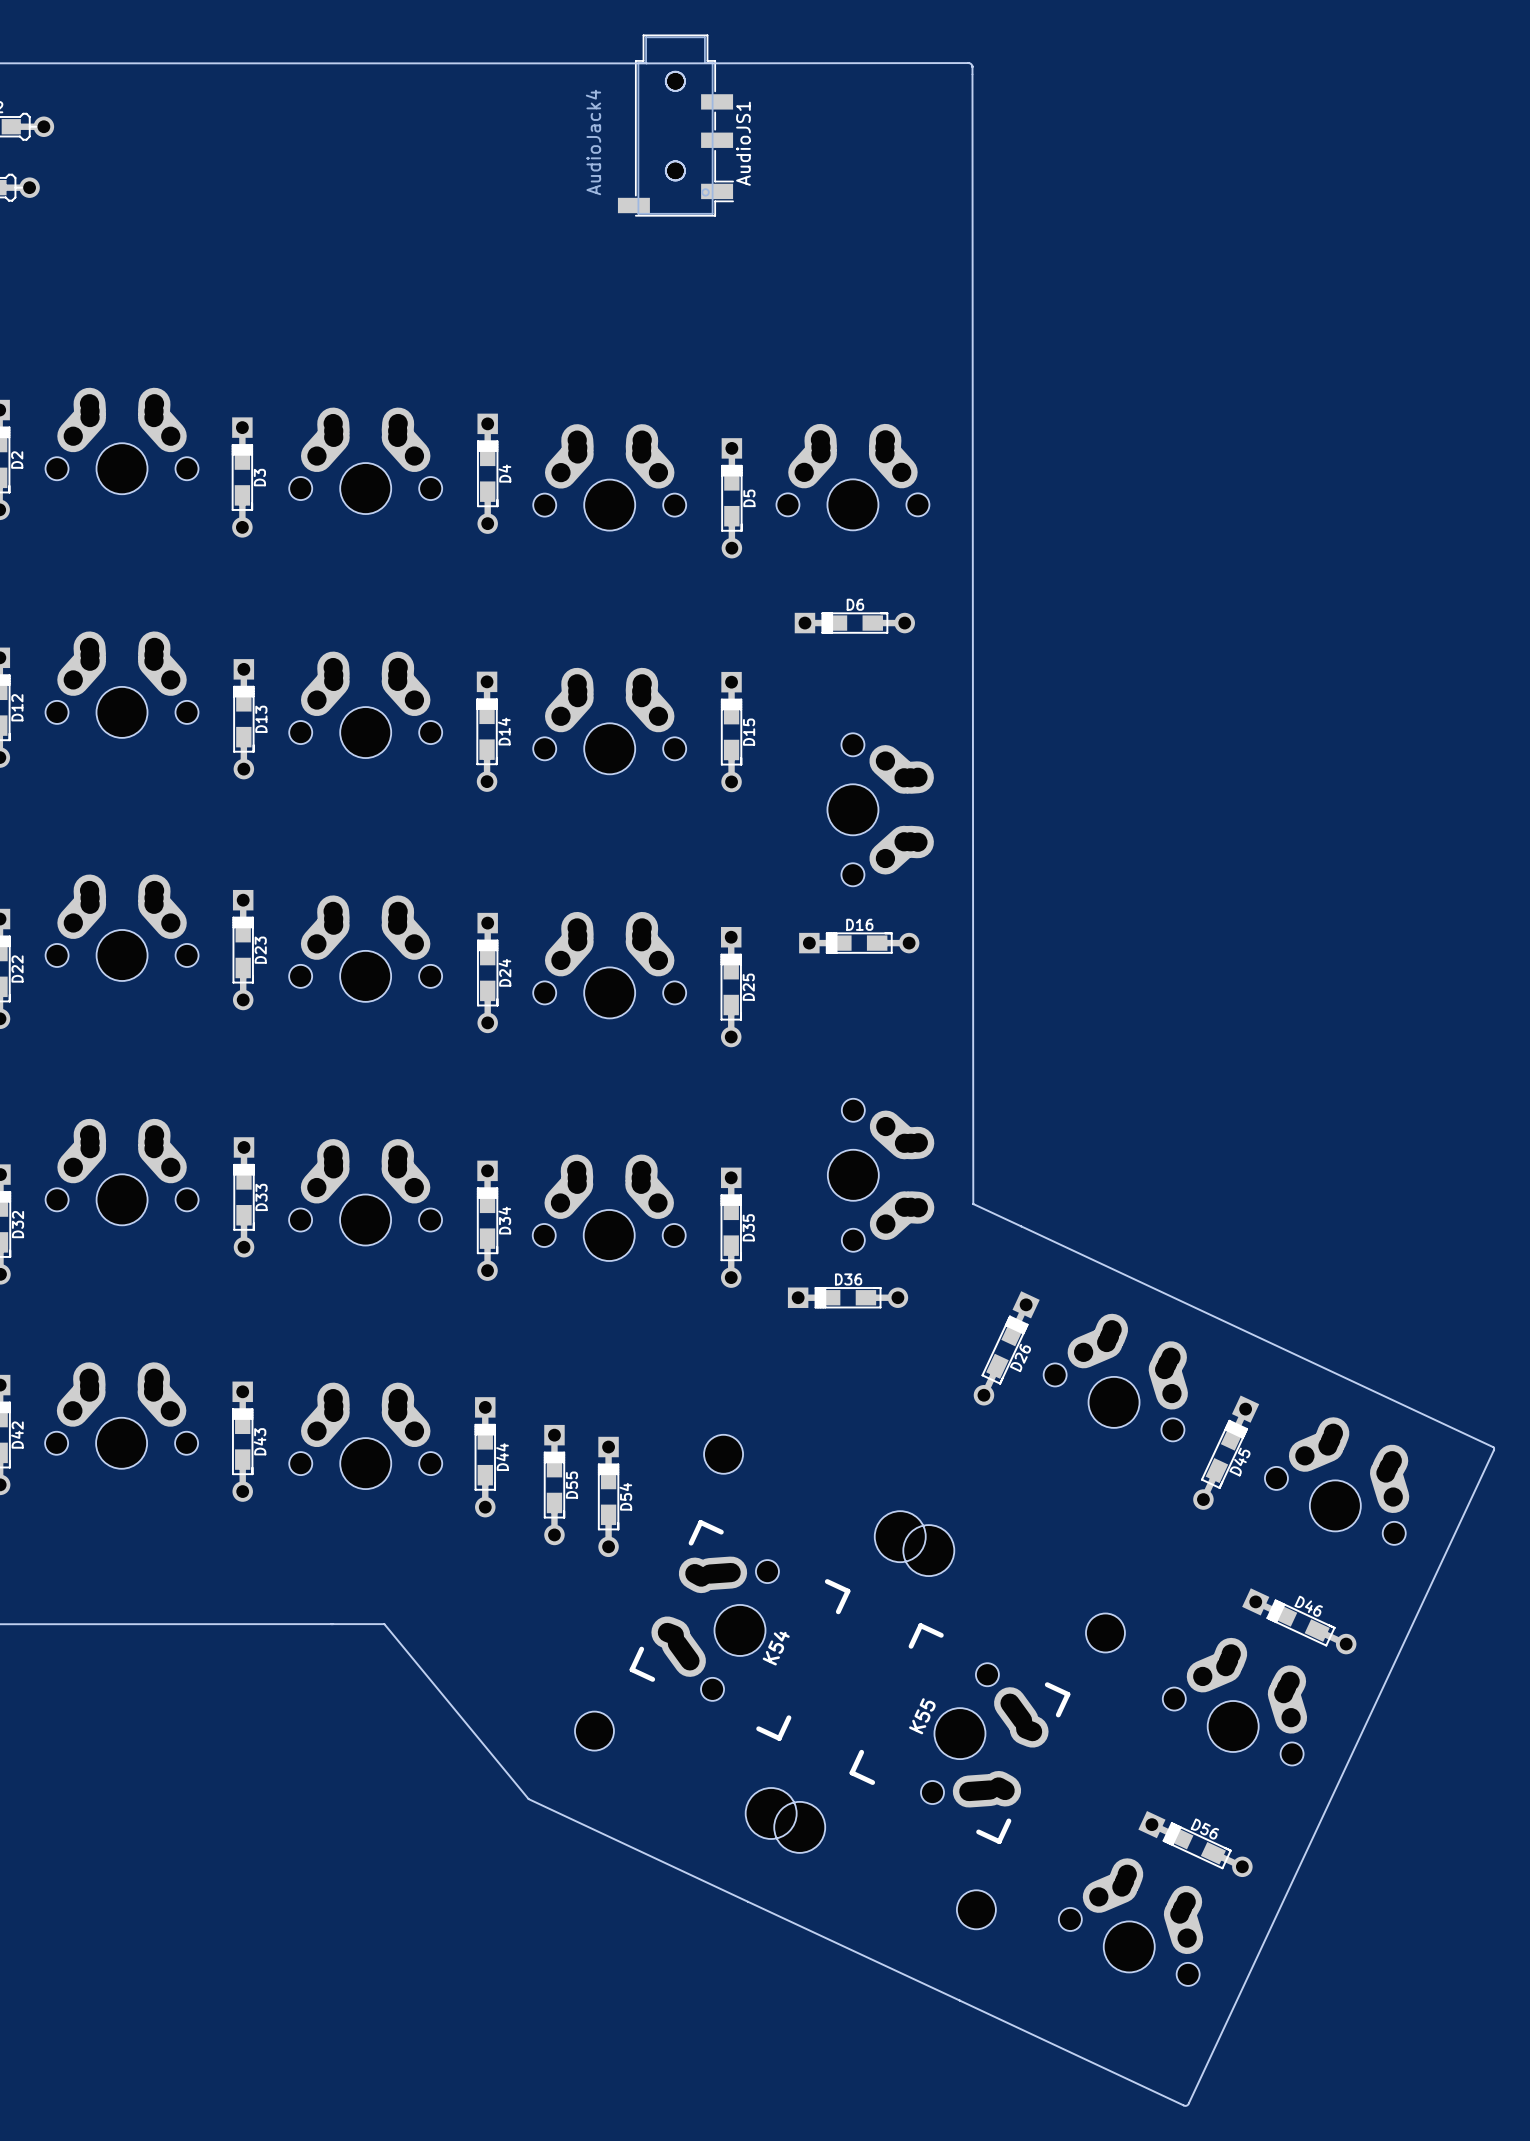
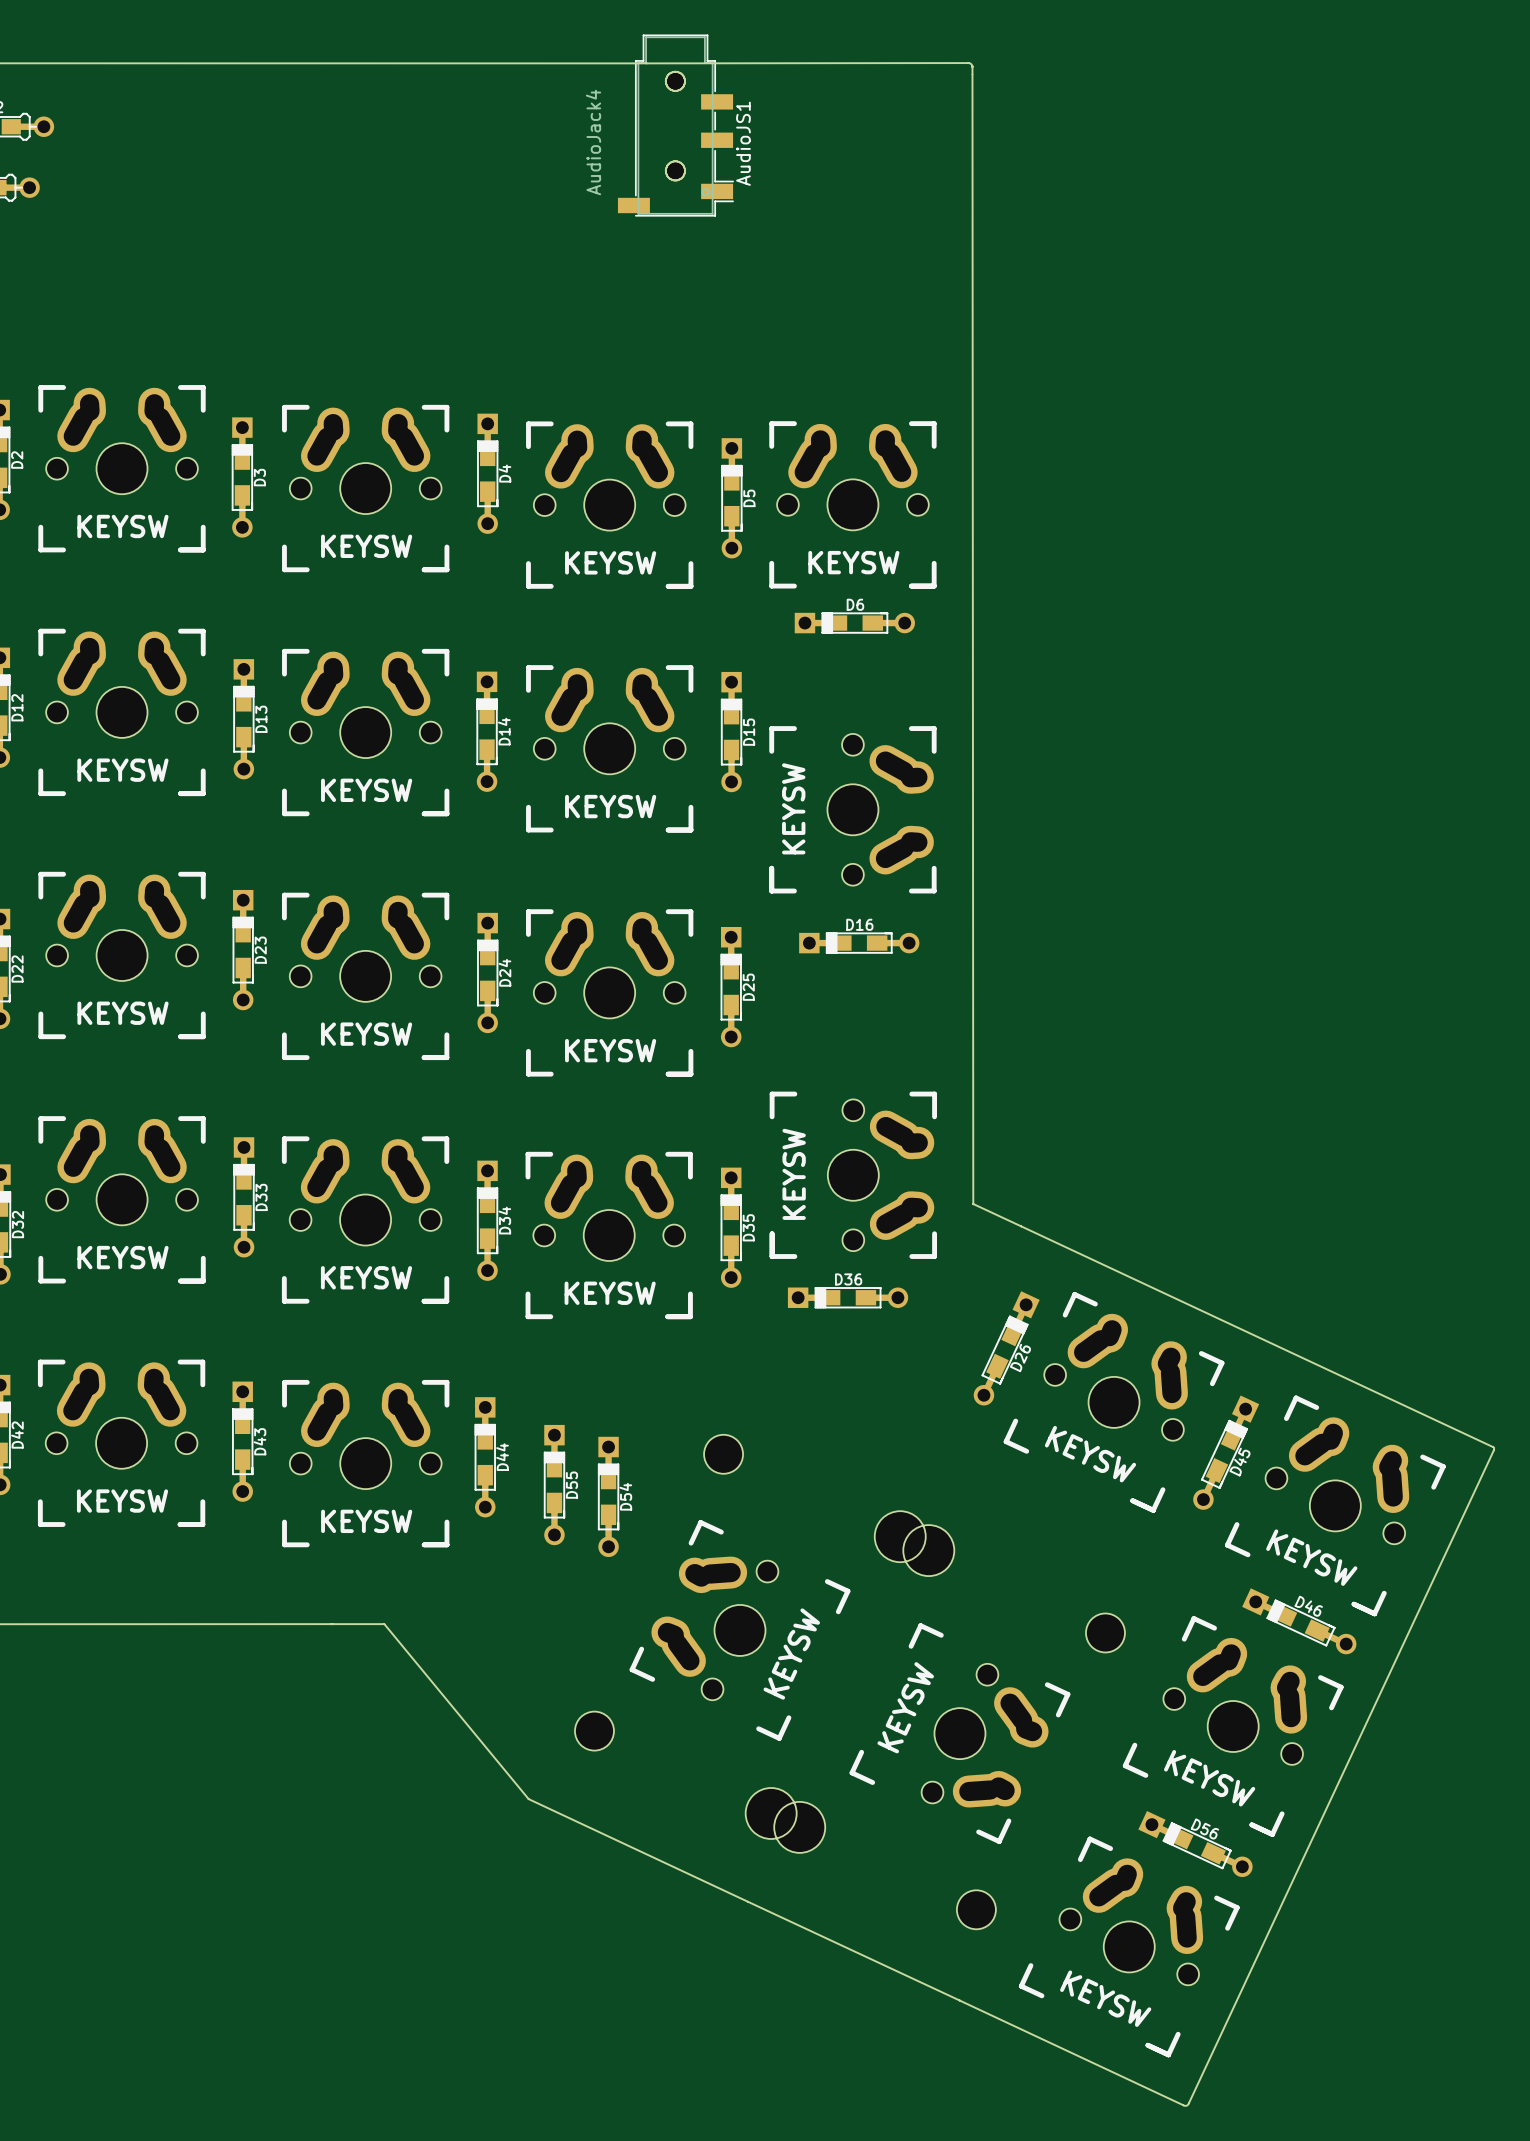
part: (122, 440) -> none
part: (365, 460) -> none
part: none -> KEYSW (122, 468)
part: (609, 477) -> none
part: (852, 477) -> none
part: none -> KEYSW (365, 488)
part: none -> KEYSW (852, 504)
part: none -> KEYSW (609, 505)
part: (122, 684) -> none
part: (365, 704) -> none
part: none -> KEYSW (122, 712)
part: (609, 721) -> none
part: none -> KEYSW (365, 732)
part: none -> KEYSW (609, 748)
part: none -> KEYSW (852, 809)
part: (880, 809) -> none
part: (122, 927) -> none
part: (365, 948) -> none
part: none -> KEYSW (122, 955)
part: (609, 965) -> none
part: none -> KEYSW (365, 976)
part: none -> KEYSW (609, 992)
part: (122, 1172) -> none
part: none -> KEYSW (853, 1175)
part: (881, 1175) -> none
part: (365, 1192) -> none
part: none -> KEYSW (122, 1199)
part: (609, 1207) -> none
part: none -> KEYSW (365, 1220)
part: none -> KEYSW (609, 1235)
part: (1115, 1377) -> none
part: none -> KEYSW (1114, 1402)
part: (121, 1415) -> none
part: (365, 1435) -> none
part: none -> KEYSW (121, 1443)
part: none -> KEYSW (365, 1463)
part: (1337, 1481) -> none
part: none -> KEYSW (1335, 1505)
K54: (750, 1636) -> none
part: none -> KEYSW (750, 1636)
part: (1234, 1701) -> none
part: none -> KEYSW (1233, 1726)
K55: (949, 1727) -> none
part: none -> KEYSW (949, 1727)
part: (1130, 1922) -> none
part: none -> KEYSW (1129, 1946)

